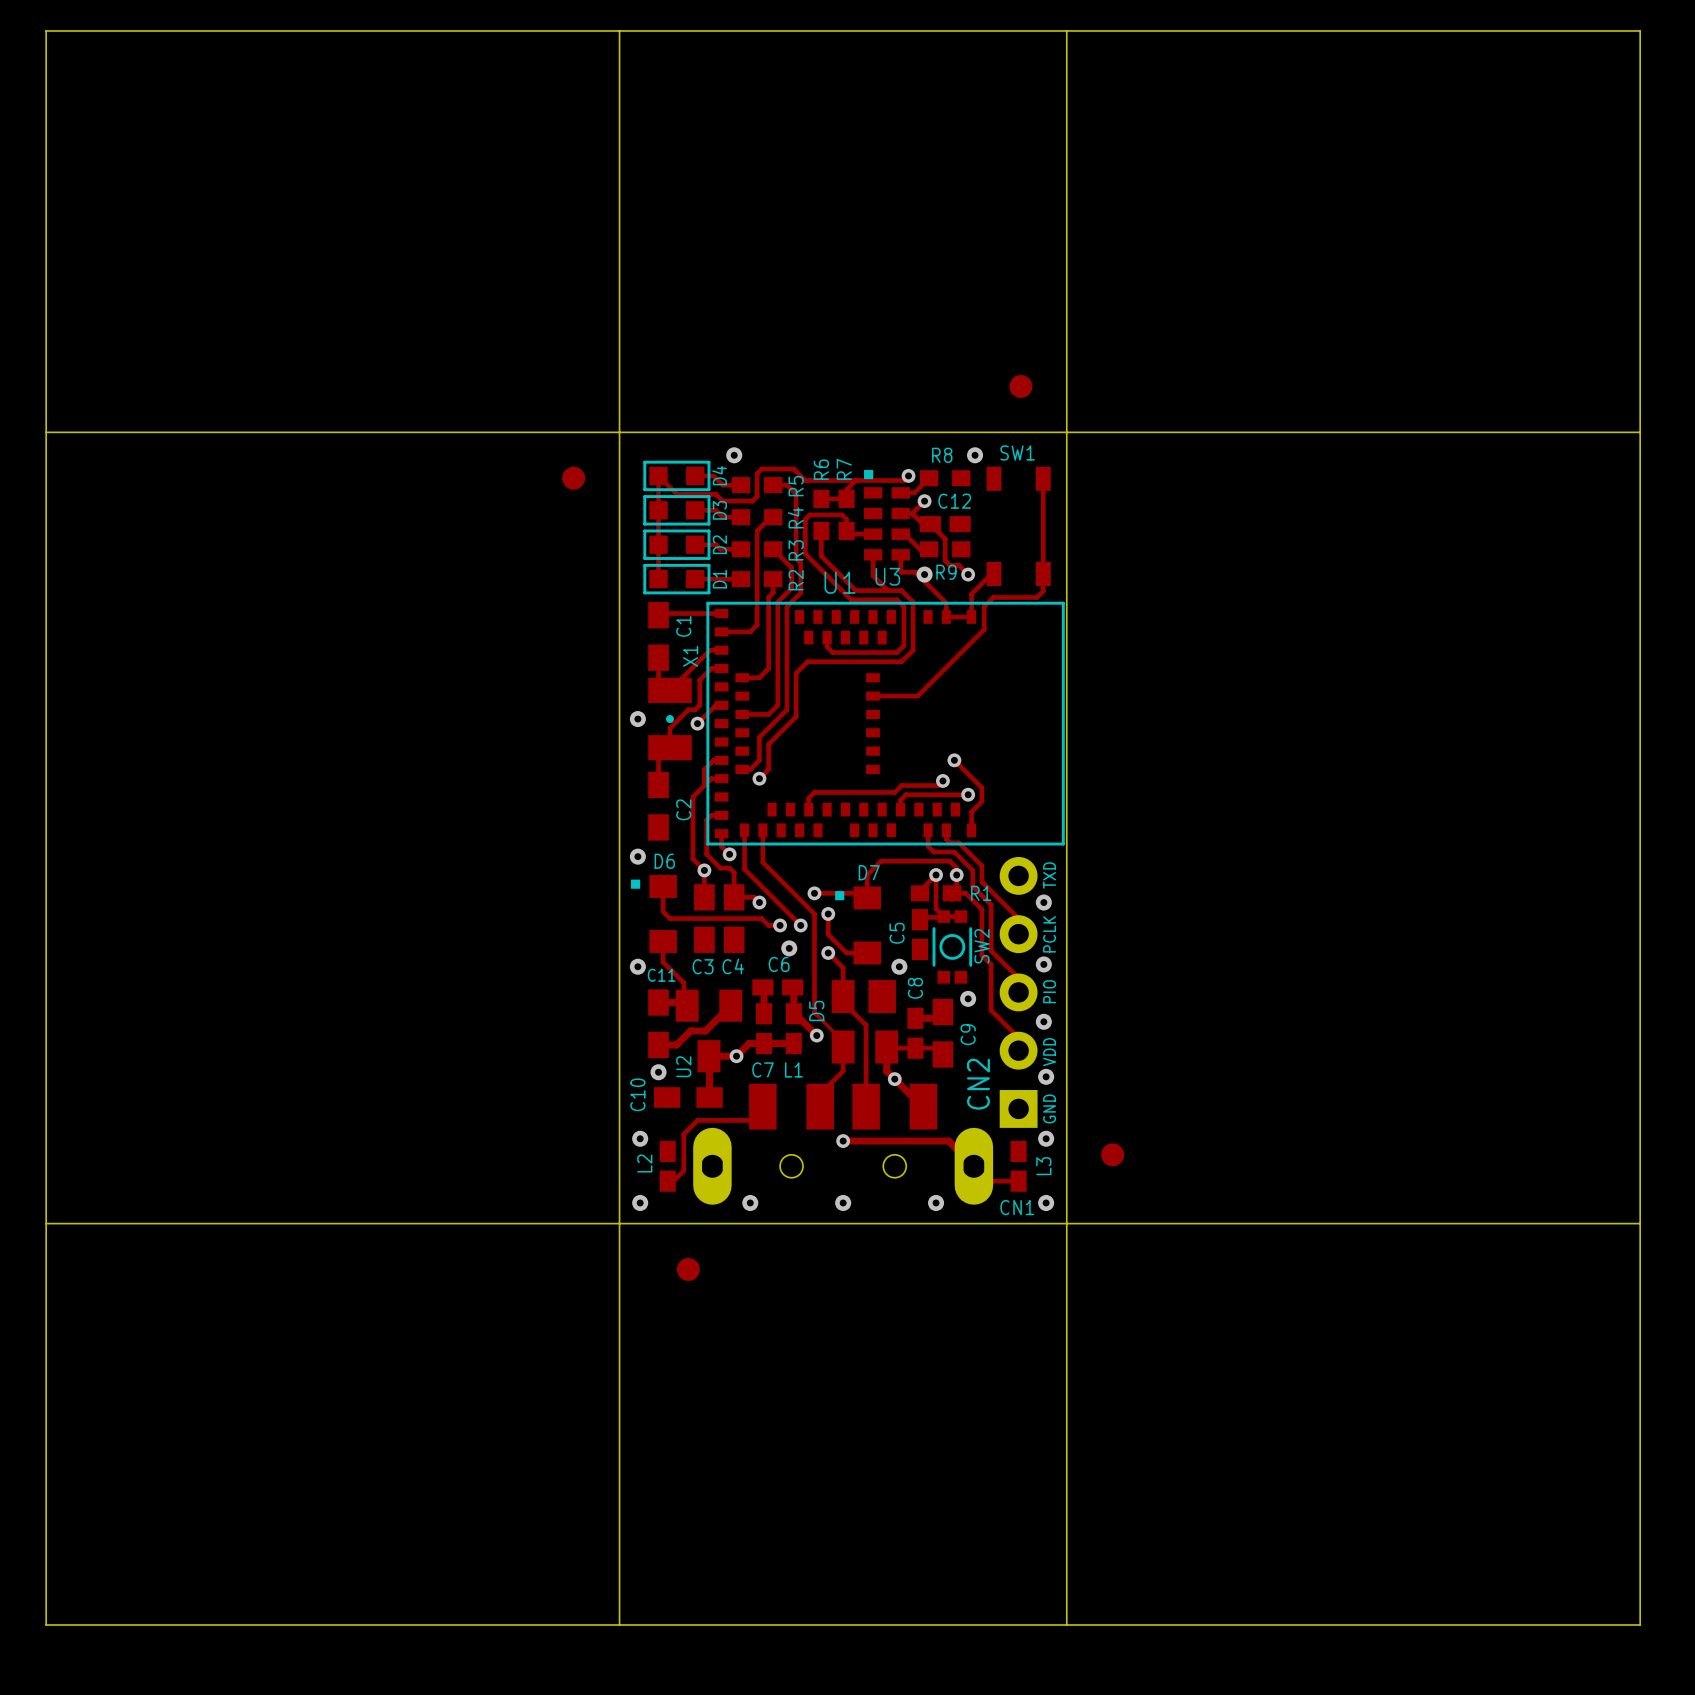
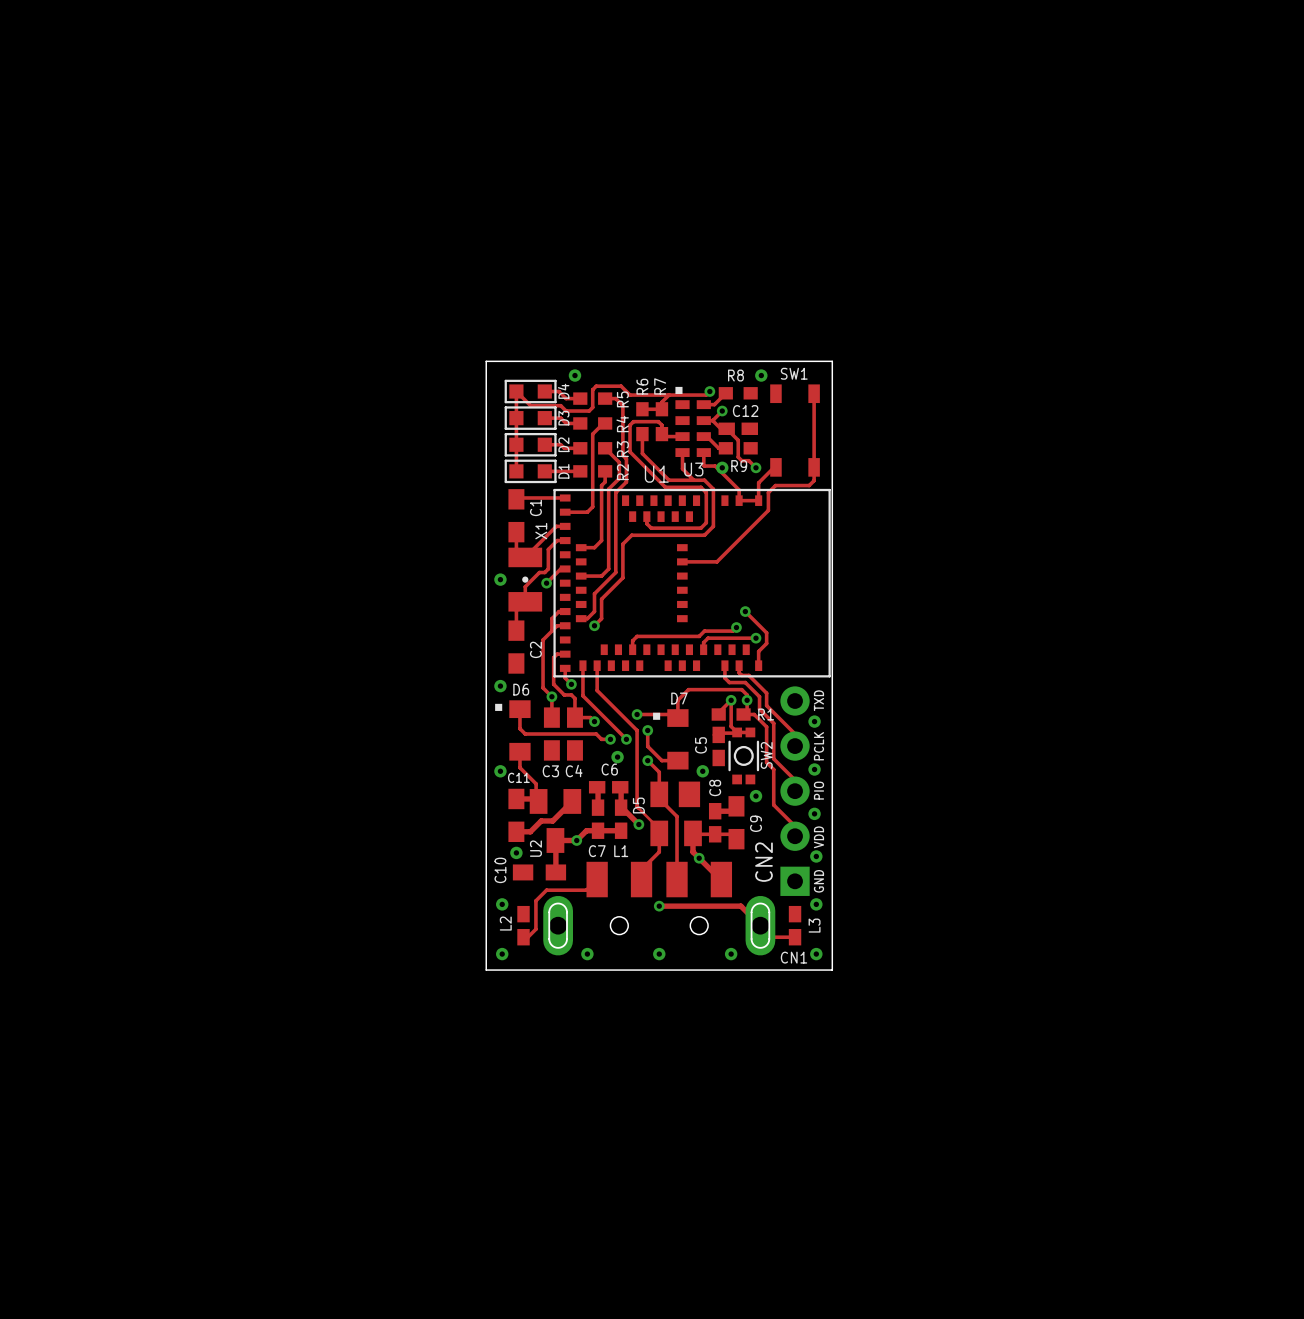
board edge: (46, 30) (1640, 30) (1640, 1624) (46, 1624) (46, 30) -> none
board edge: (619, 30) (619, 436) -> (832, 361) (486, 361)
board edge: (1066, 30) (1066, 436) -> none
part: (1020, 386) -> none
board edge: (46, 432) (1640, 432) -> none
part: (573, 478) -> none
part: (1112, 1154) -> none
board edge: (46, 1223) (619, 1223) (619, 1624) -> none
board edge: (1640, 1223) (1066, 1223) (1066, 1624) -> none
part: (688, 1269) -> none

